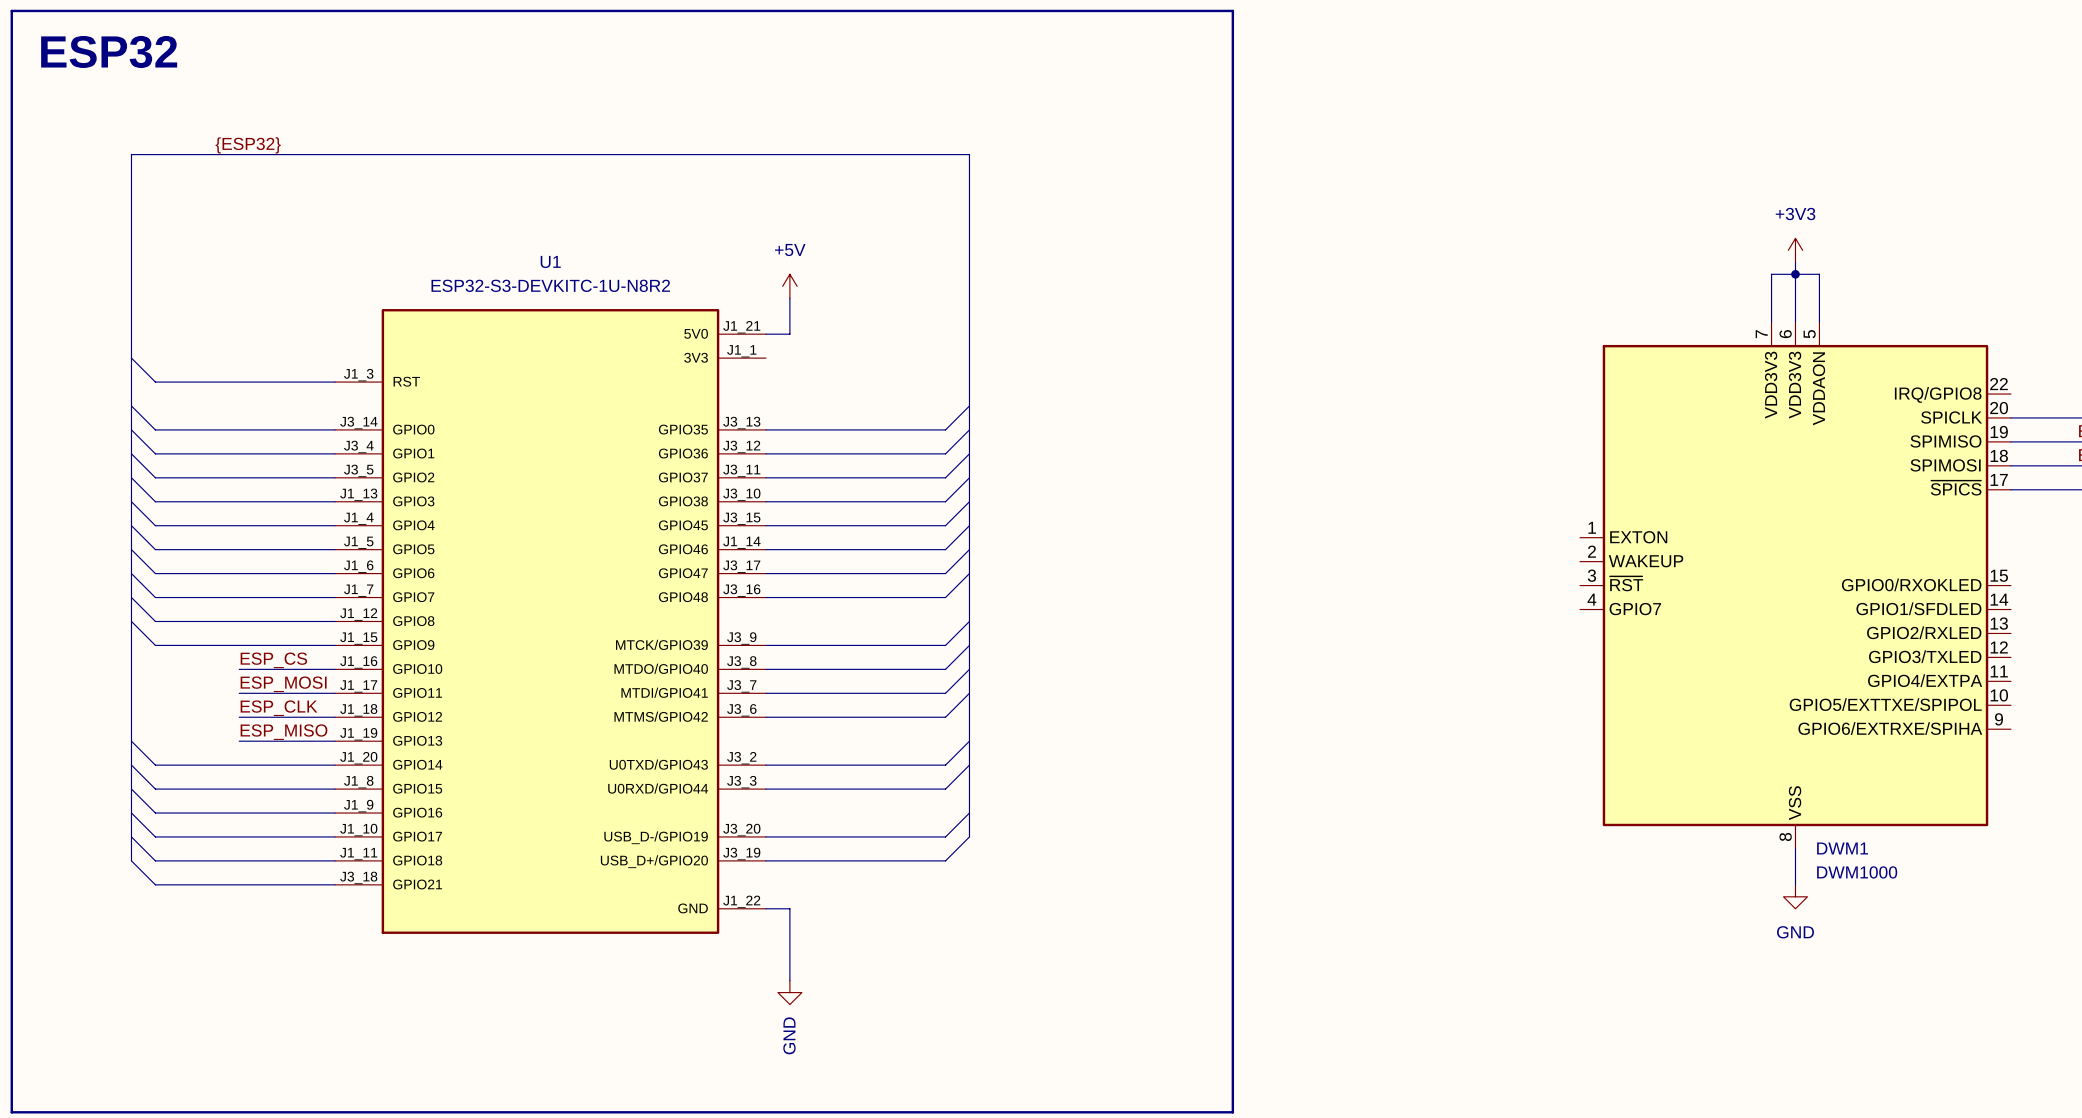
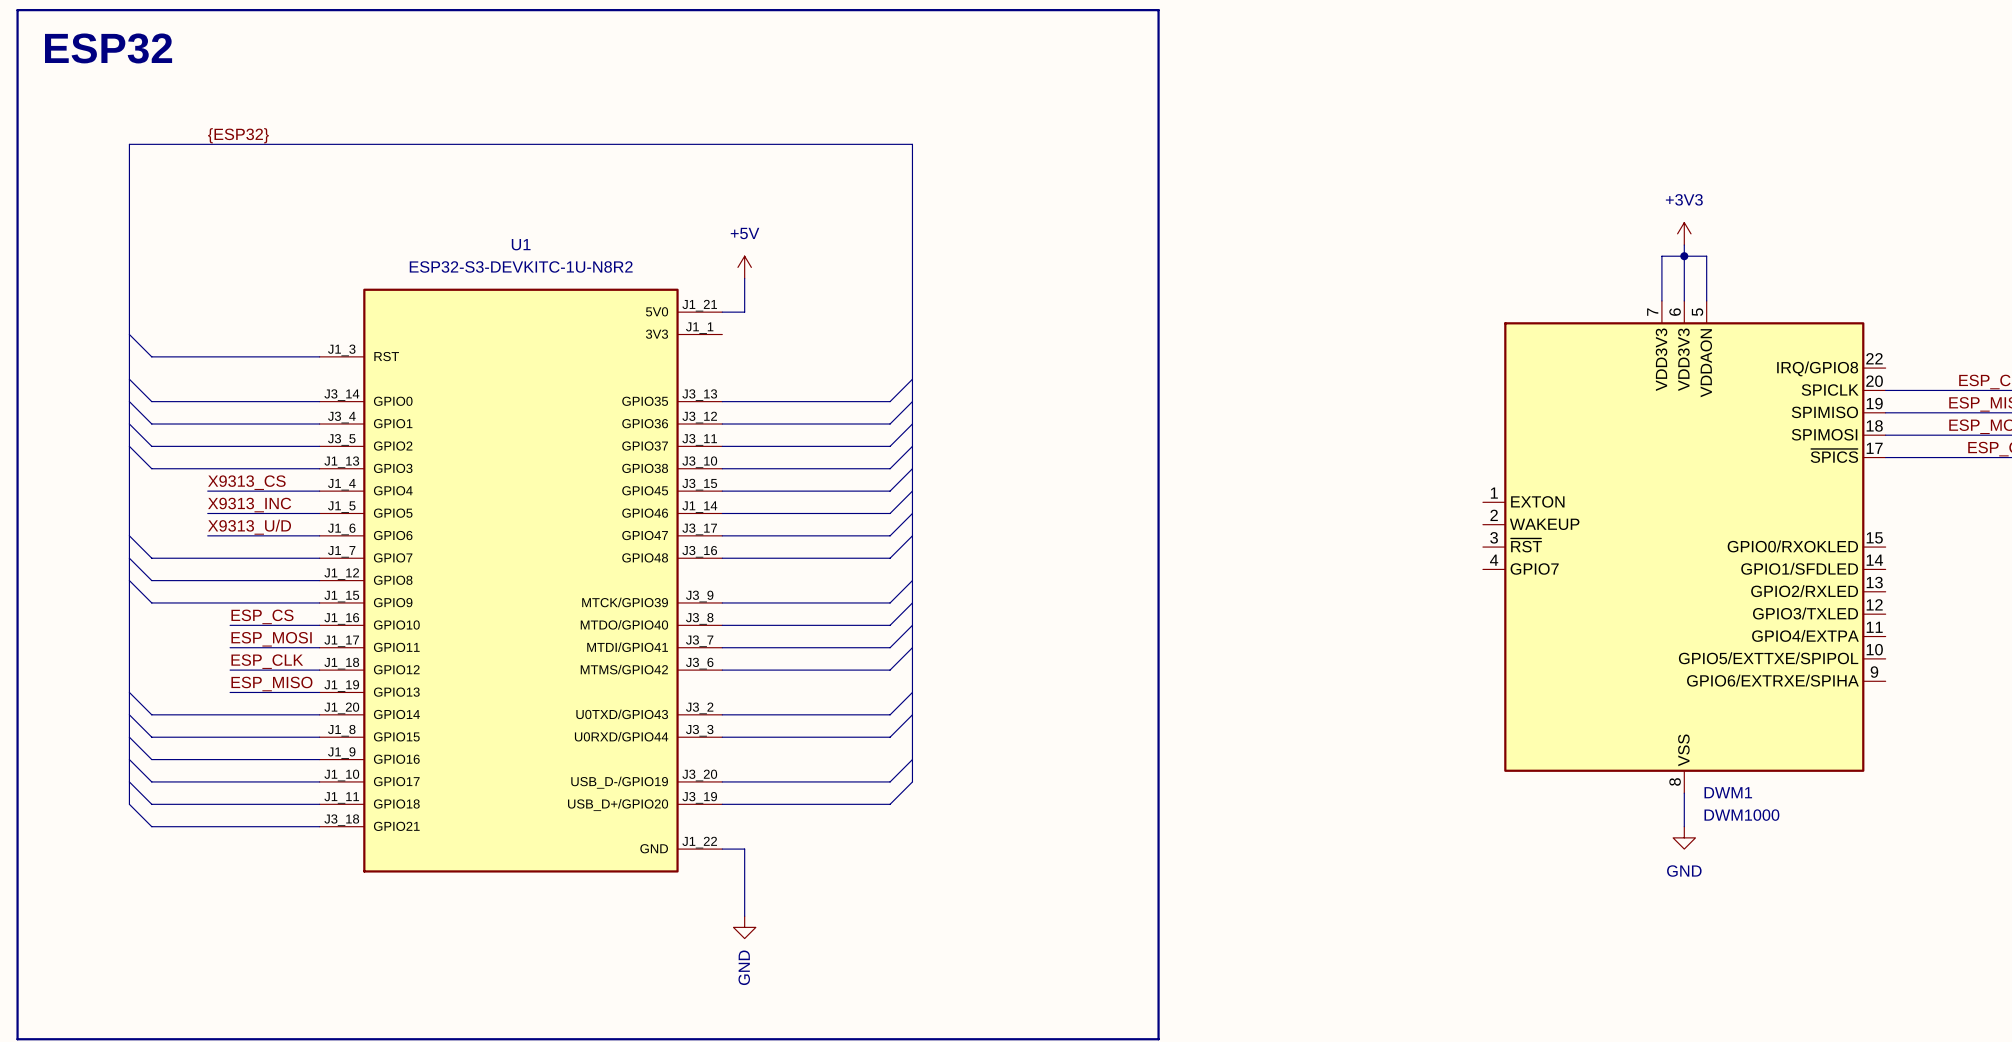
wire: (131, 501) (155, 525) (215, 525) -> none
label: none -> X9313_CS (246, 482)
wire: (131, 525) (155, 549) (215, 549) -> none
label: none -> X9313_INC (249, 505)
wire: (131, 549) (155, 573) (215, 573) -> none
label: none -> X9313_U/D (249, 527)

